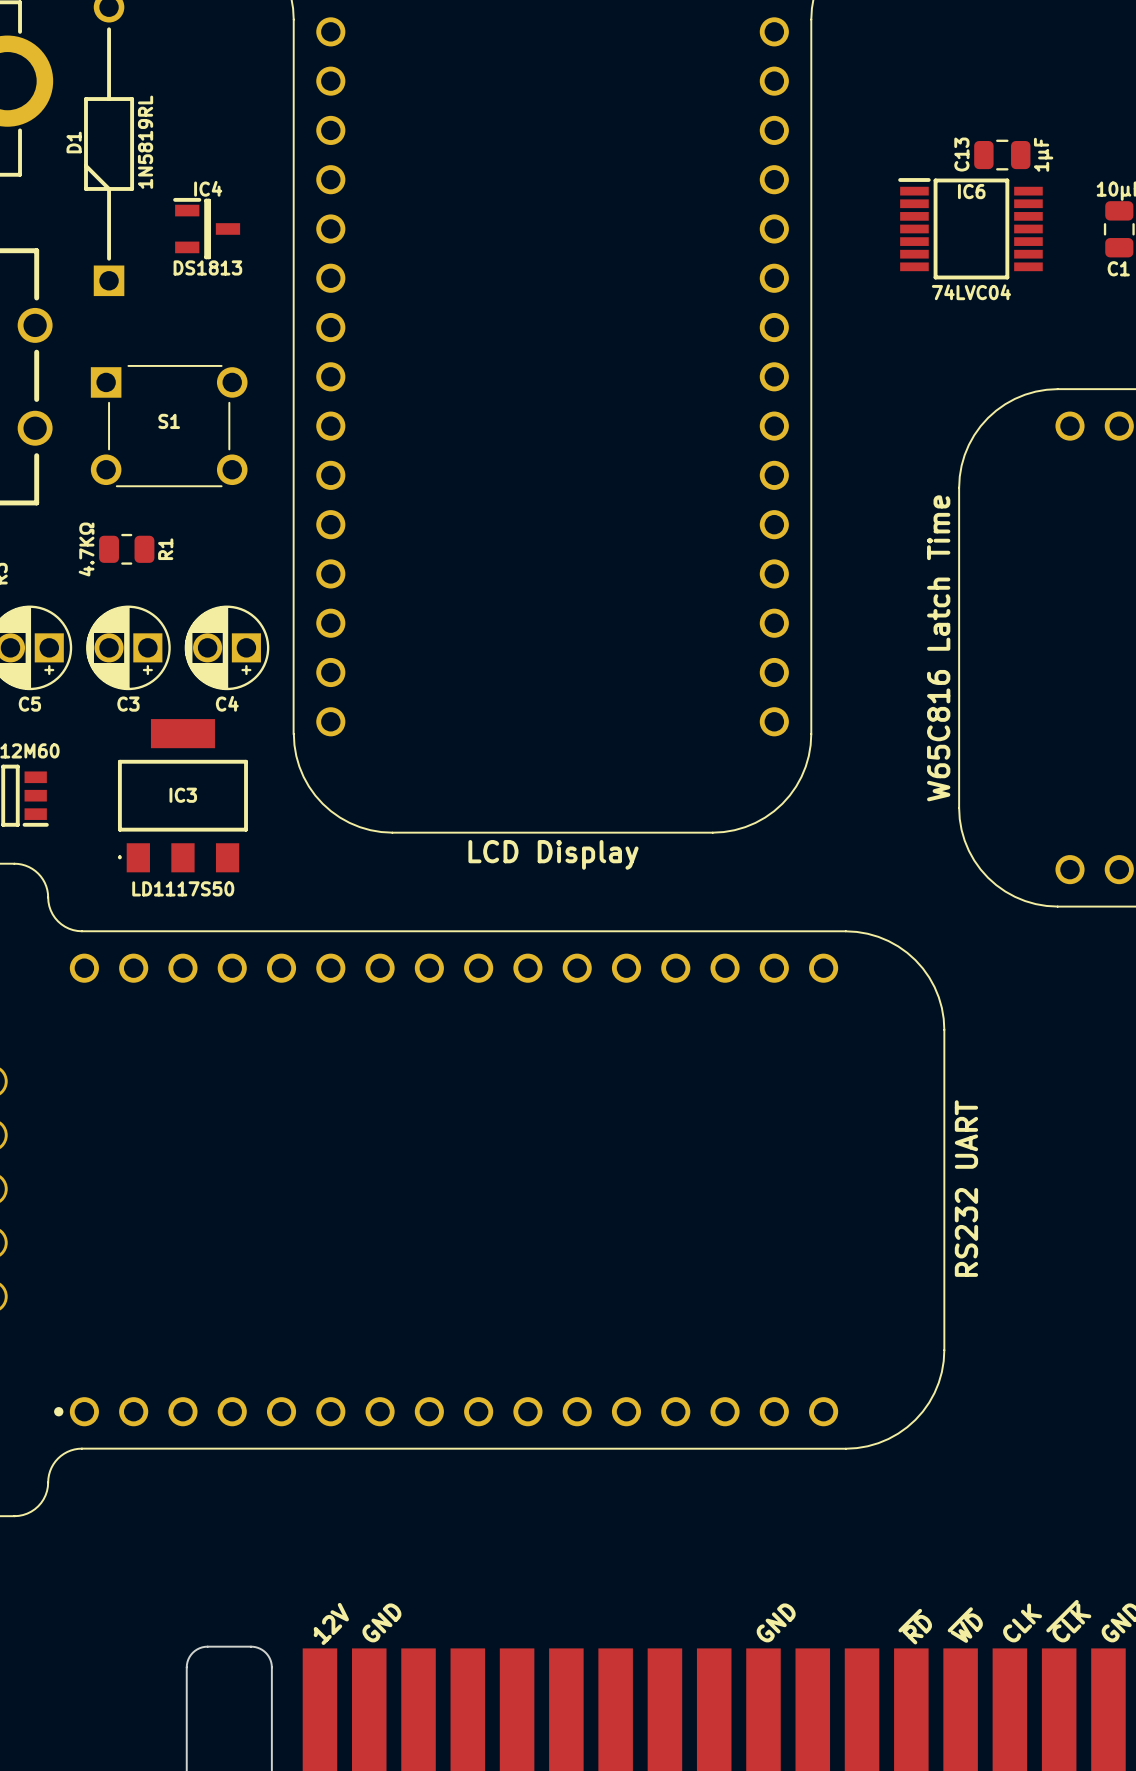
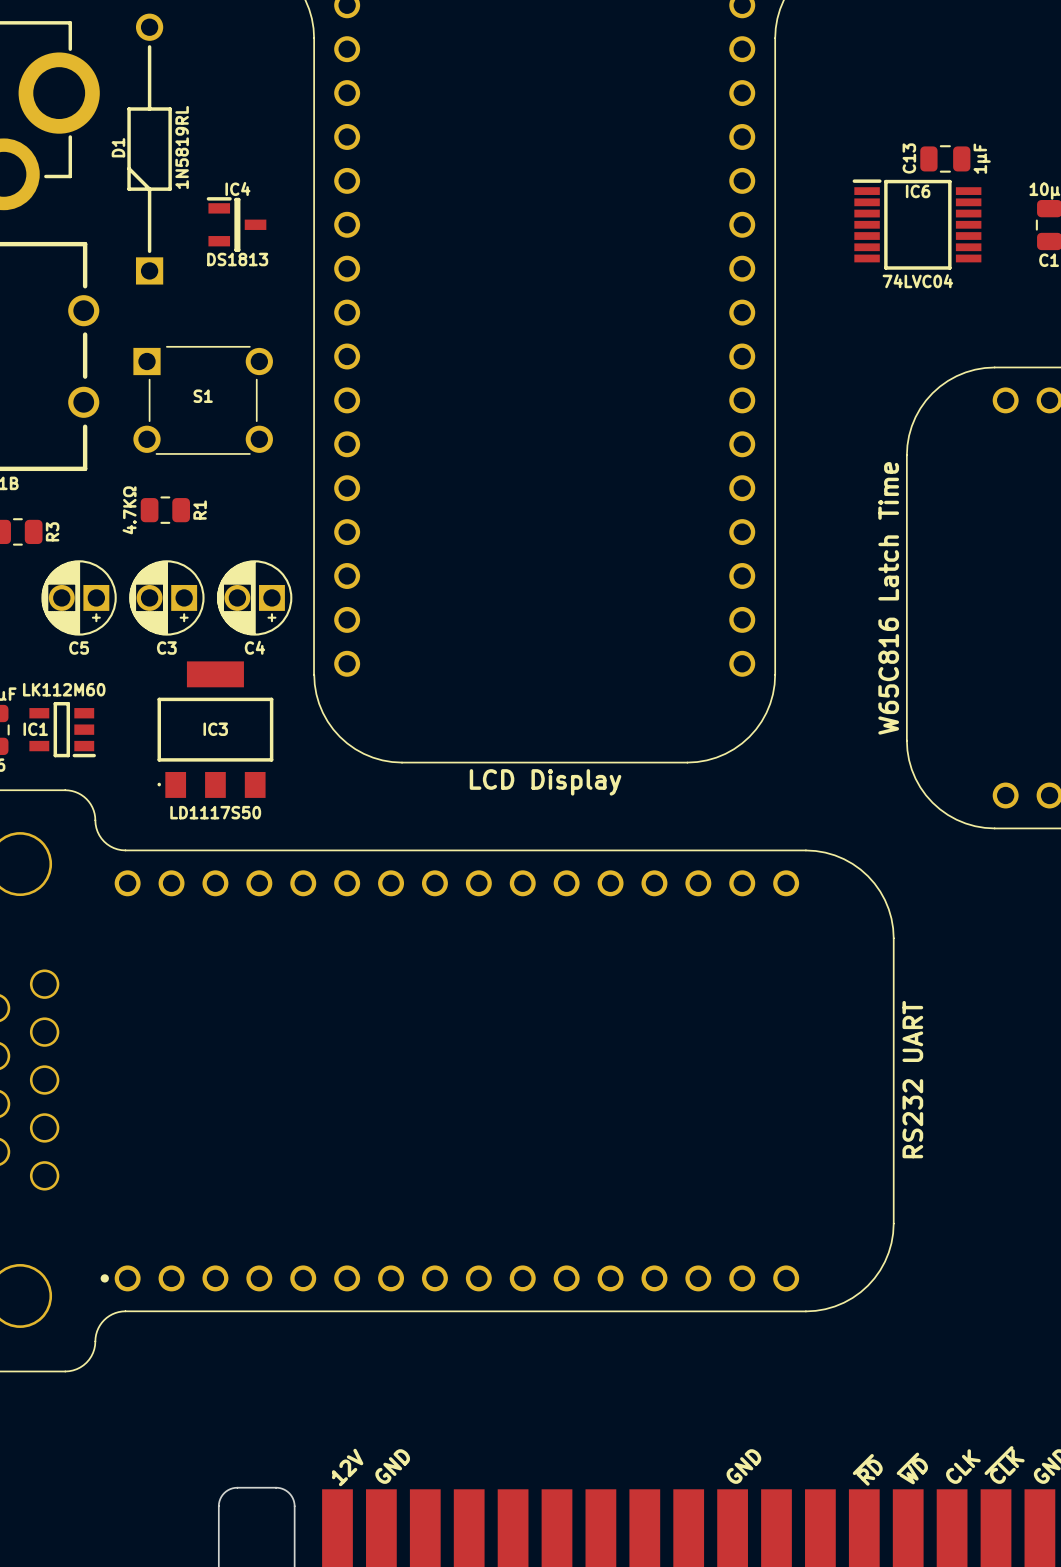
part text: none -> RS232 UART (912, 1079)
part text: RS232 UART (966, 1188) -> none

